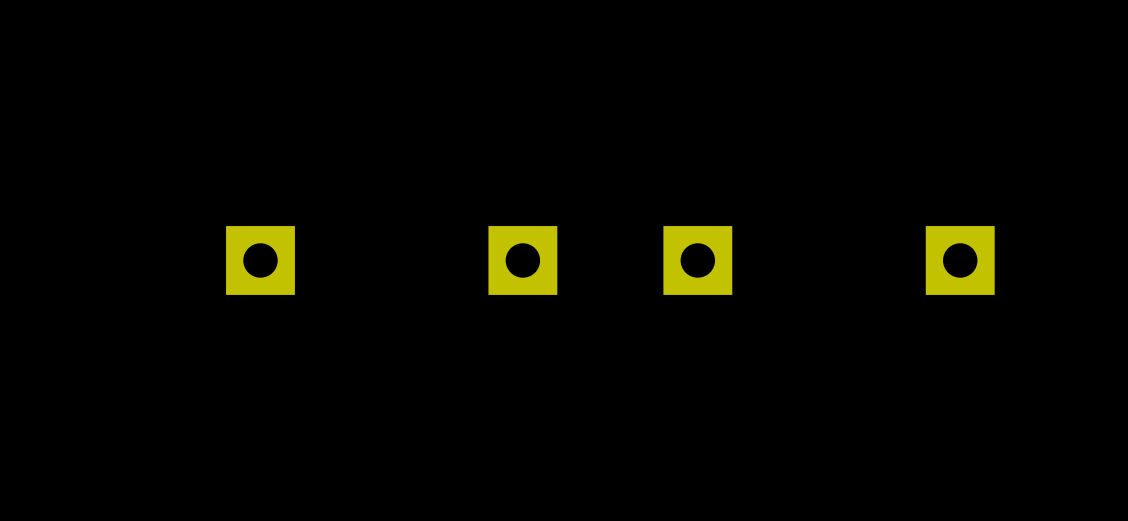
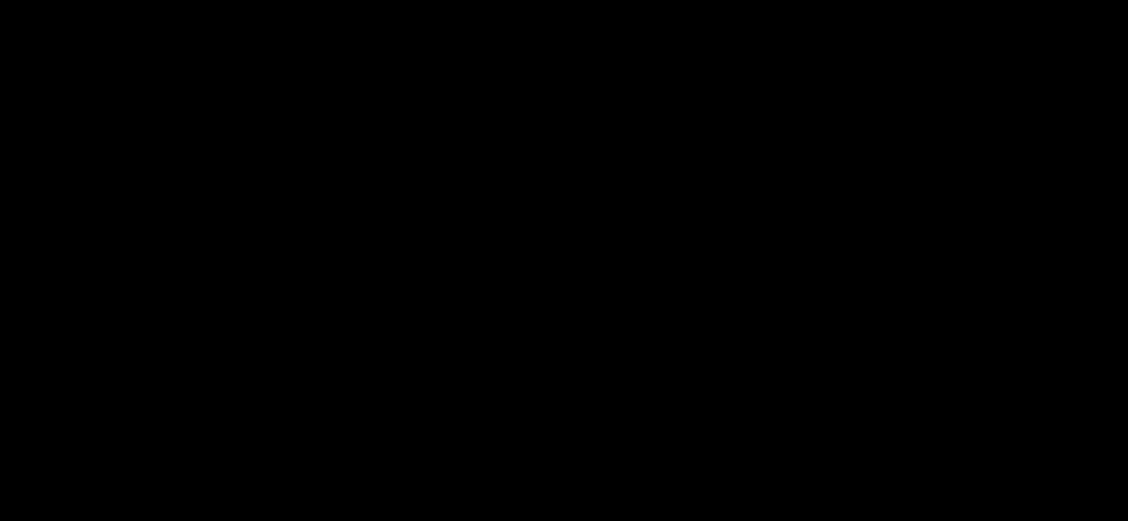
part: (260, 260) -> none
part: (522, 260) -> none
part: (697, 260) -> none
part: (960, 260) -> none

